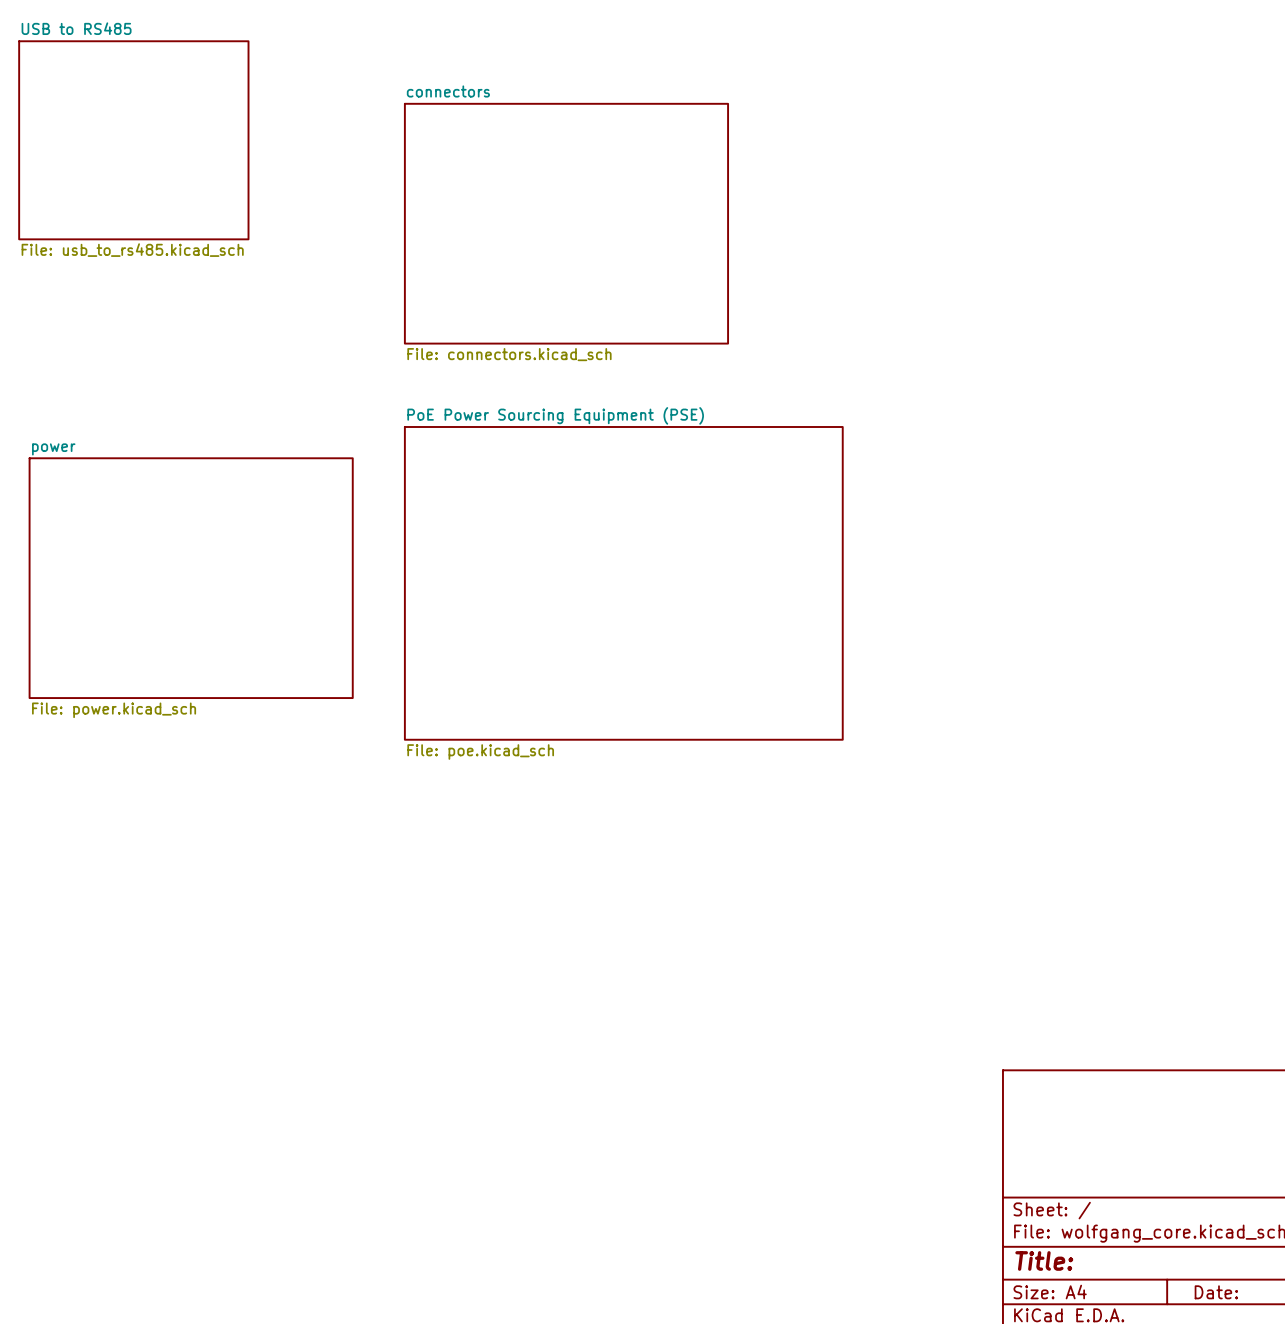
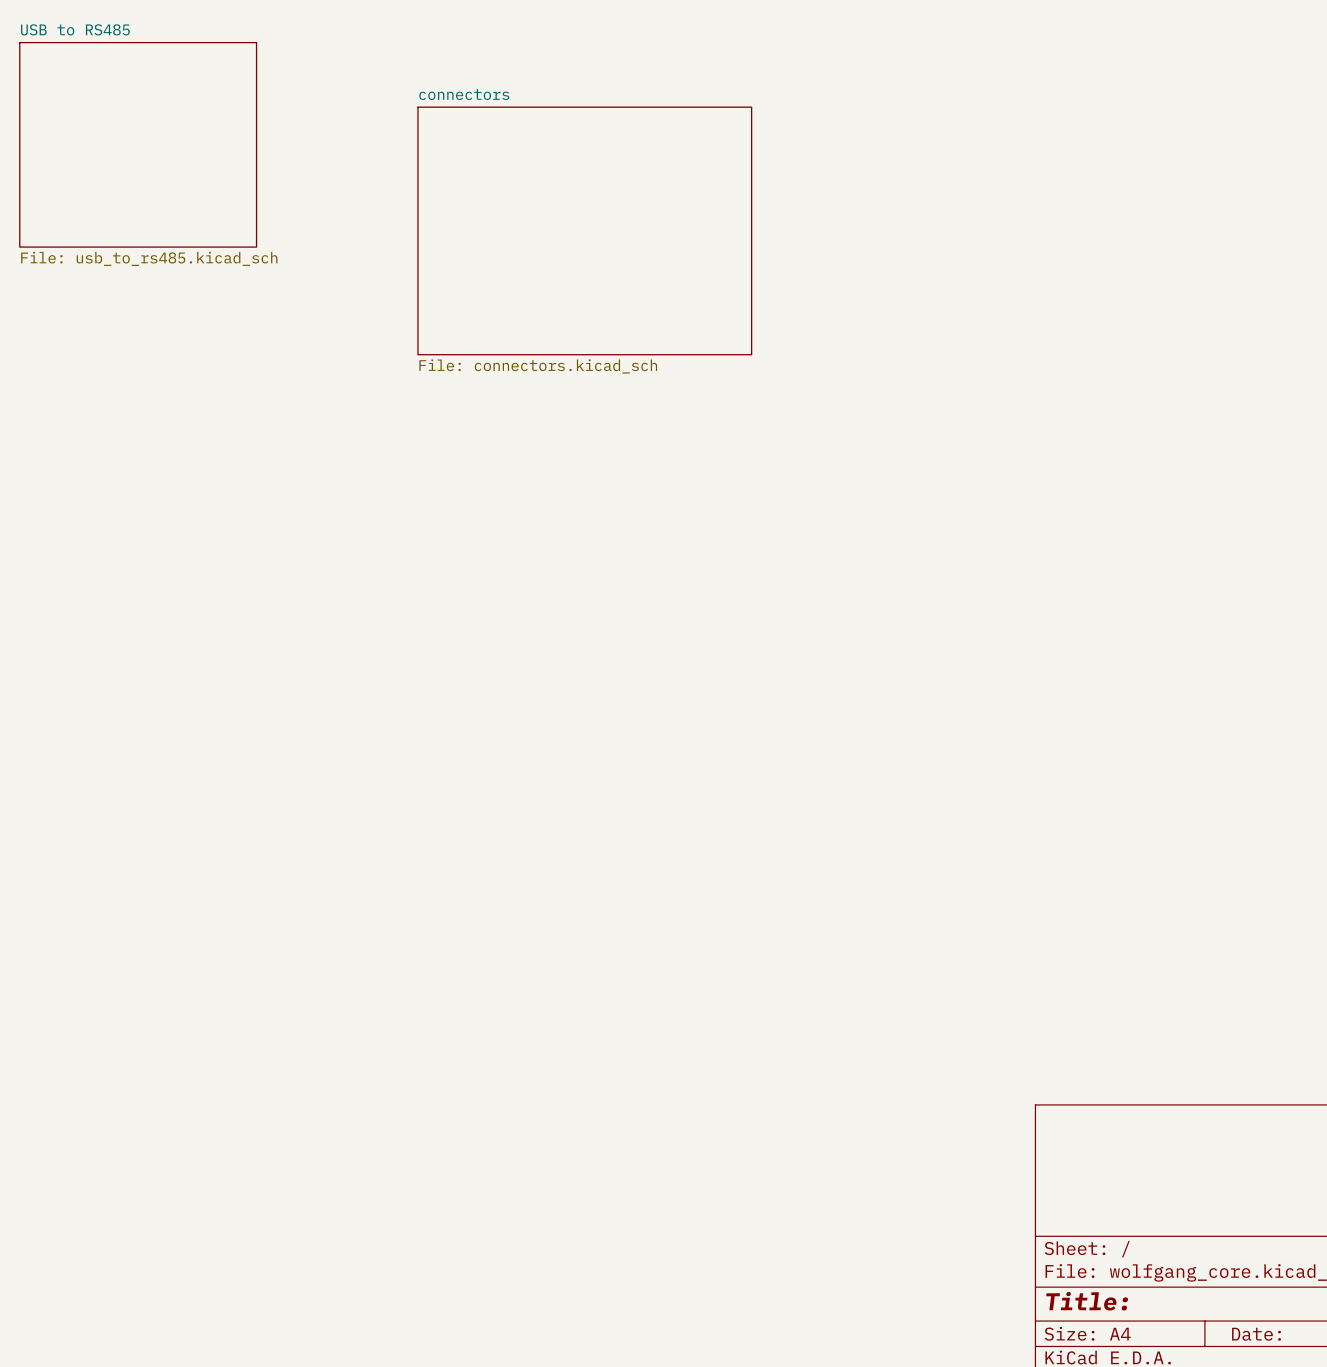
sheet power: File: power.kicad_sch (191, 578) -> none
sheet PoE Power Sourcing Equipment (PSE): File: poe.kicad_sch (623, 583) -> none

